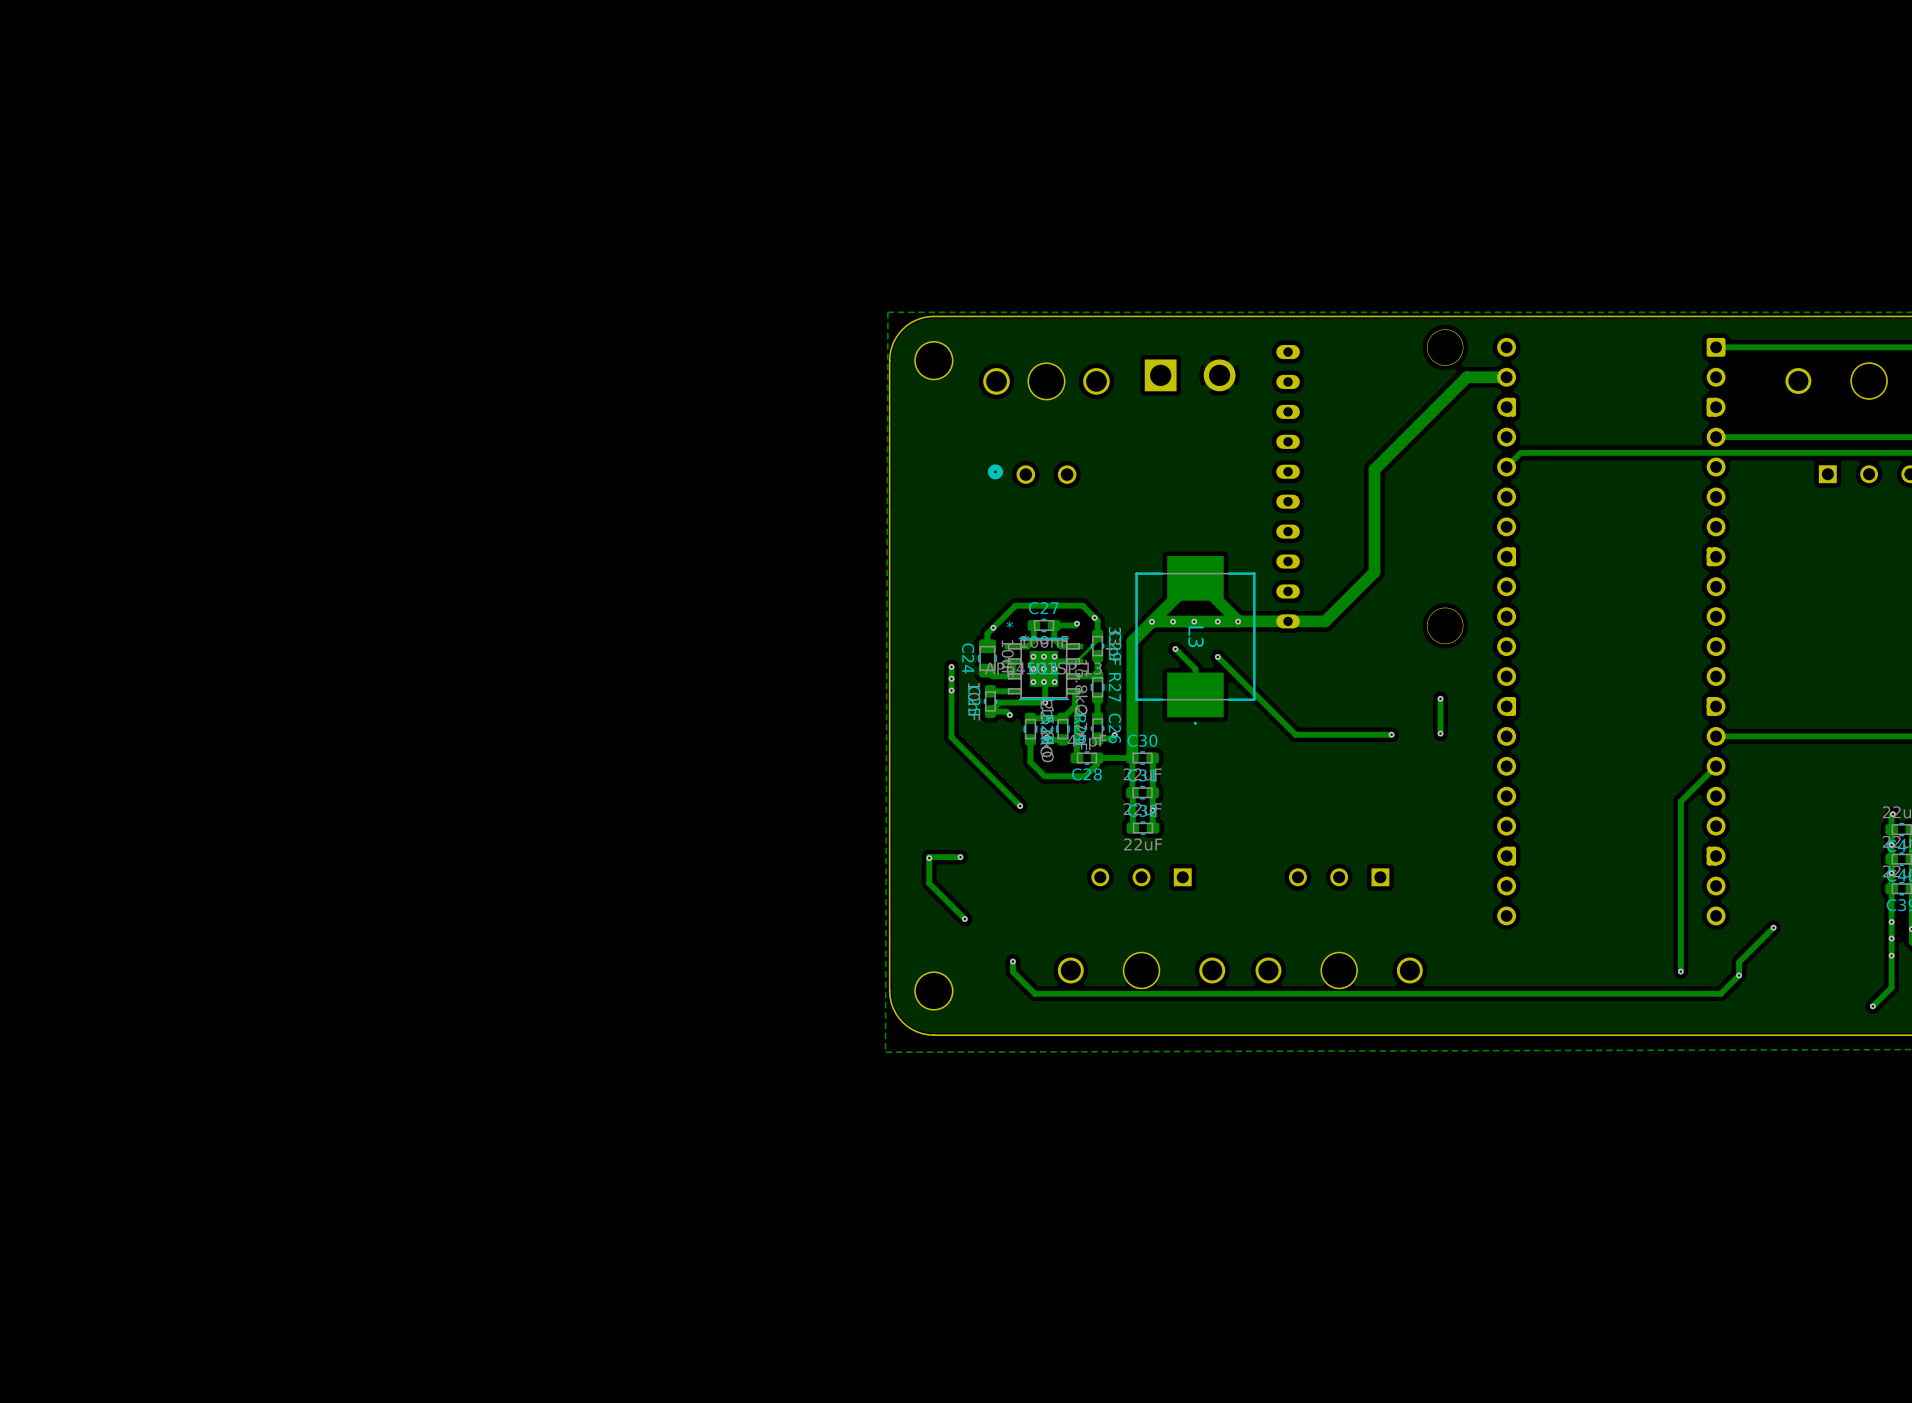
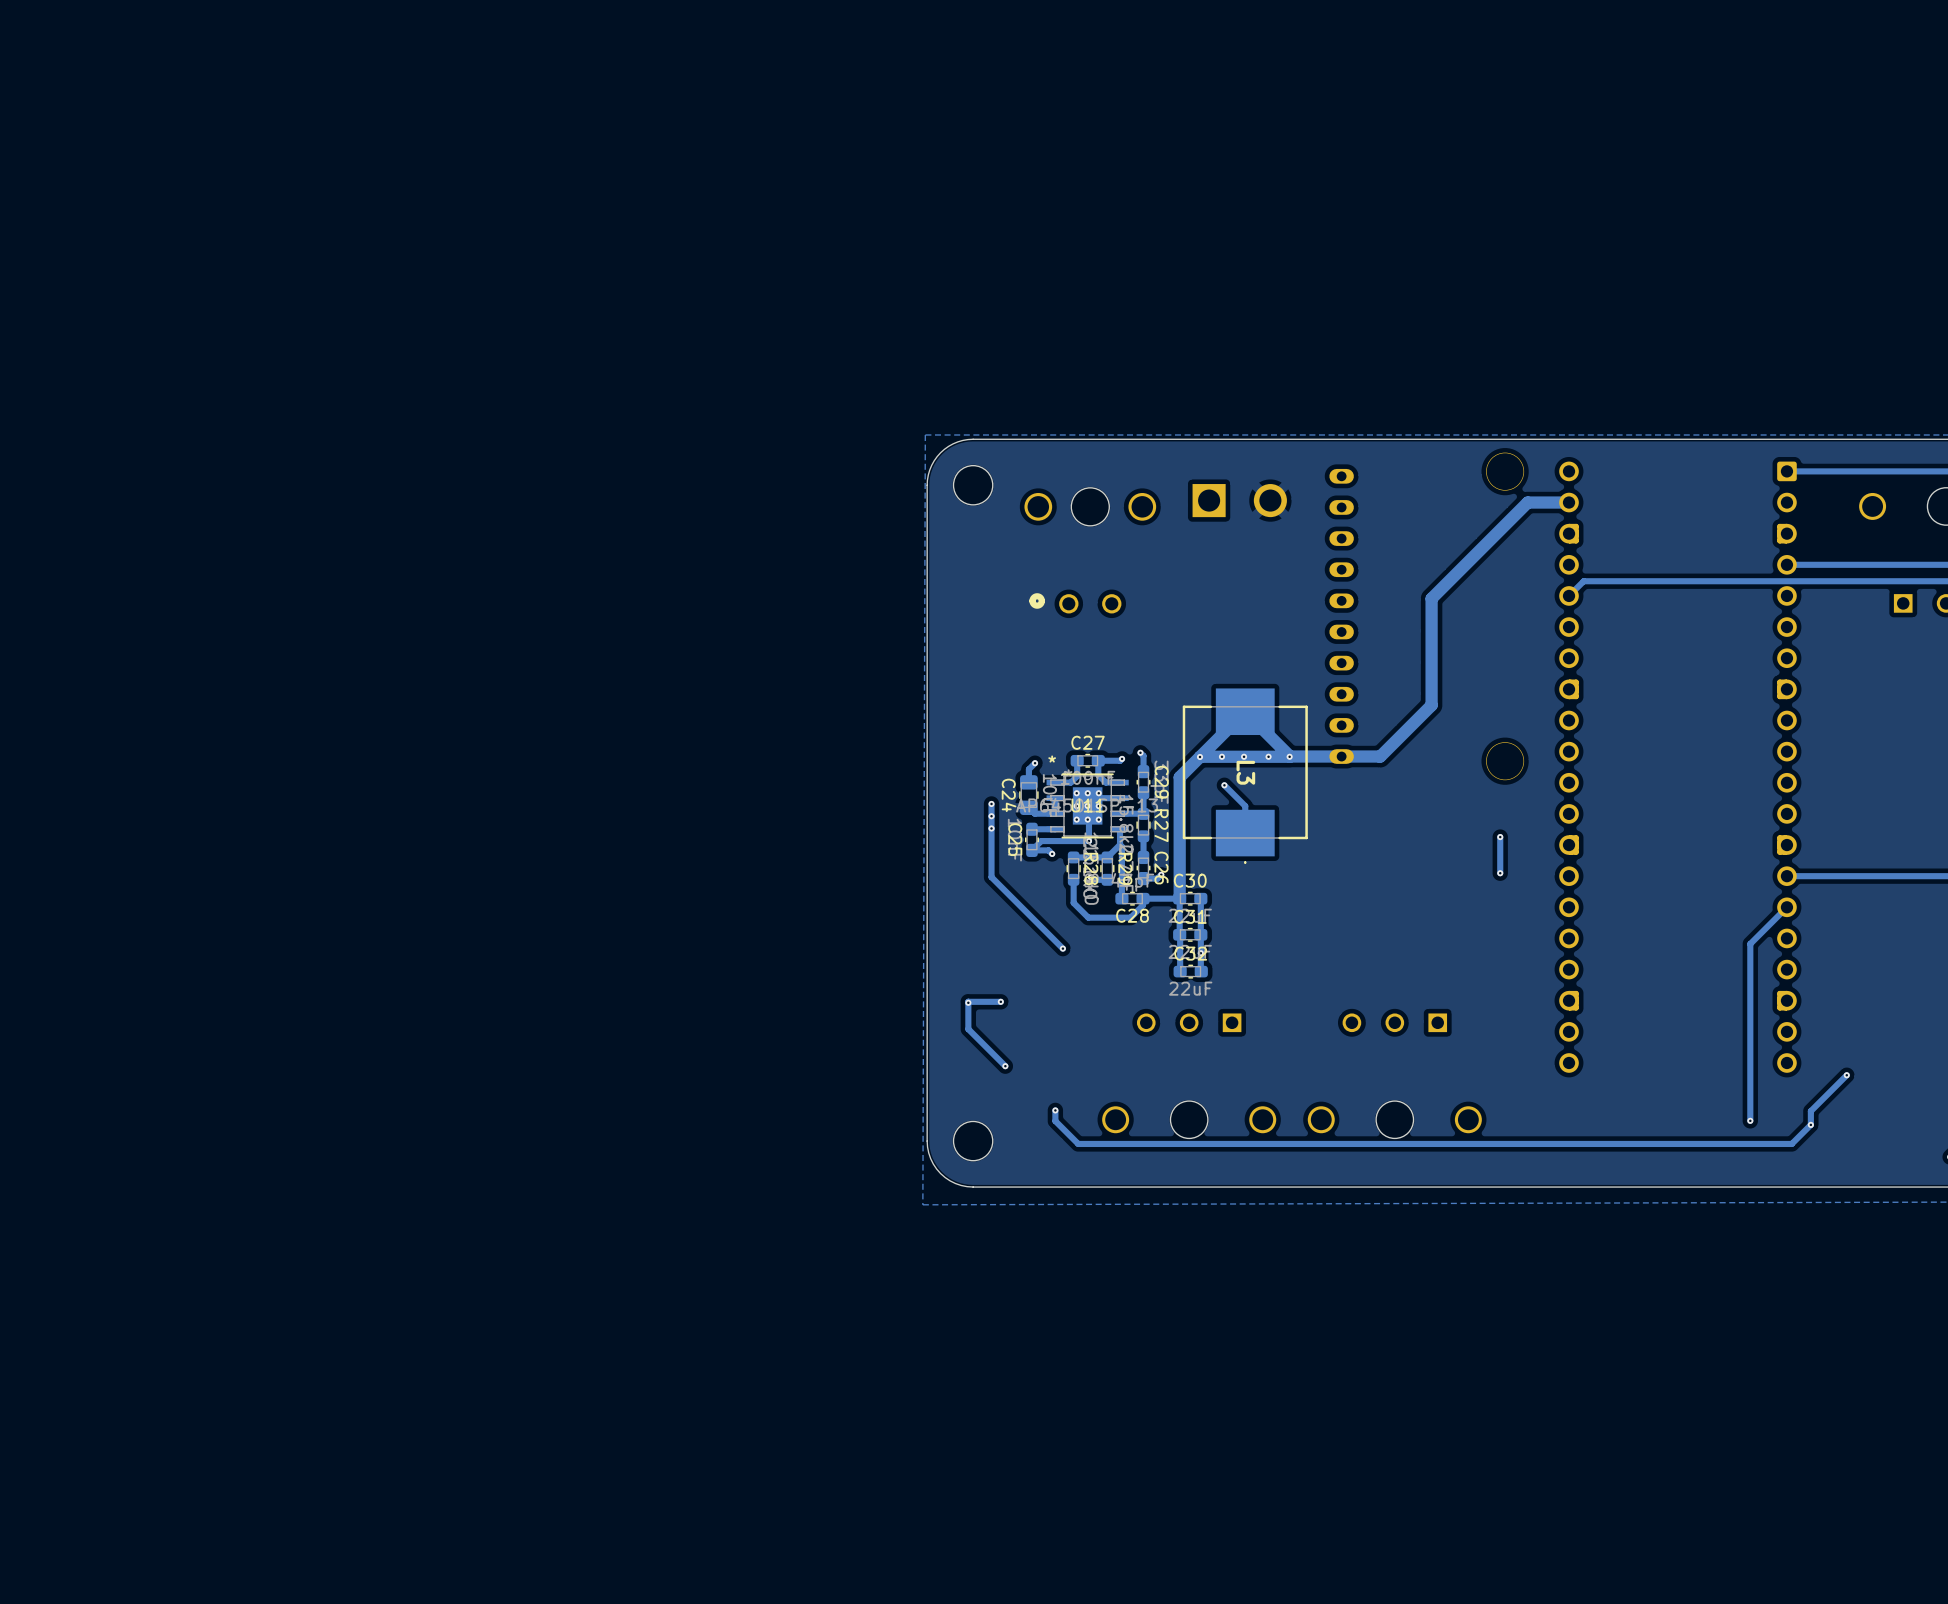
track: (1094, 617) (1082, 605) (1015, 605) (993, 627) -> none
track: (1097, 635) (1097, 640) (1075, 661) -> none
track: (1217, 656) (1295, 734) (1391, 734) -> none
via: (1217, 656) -> none
via: (1391, 734) -> none

